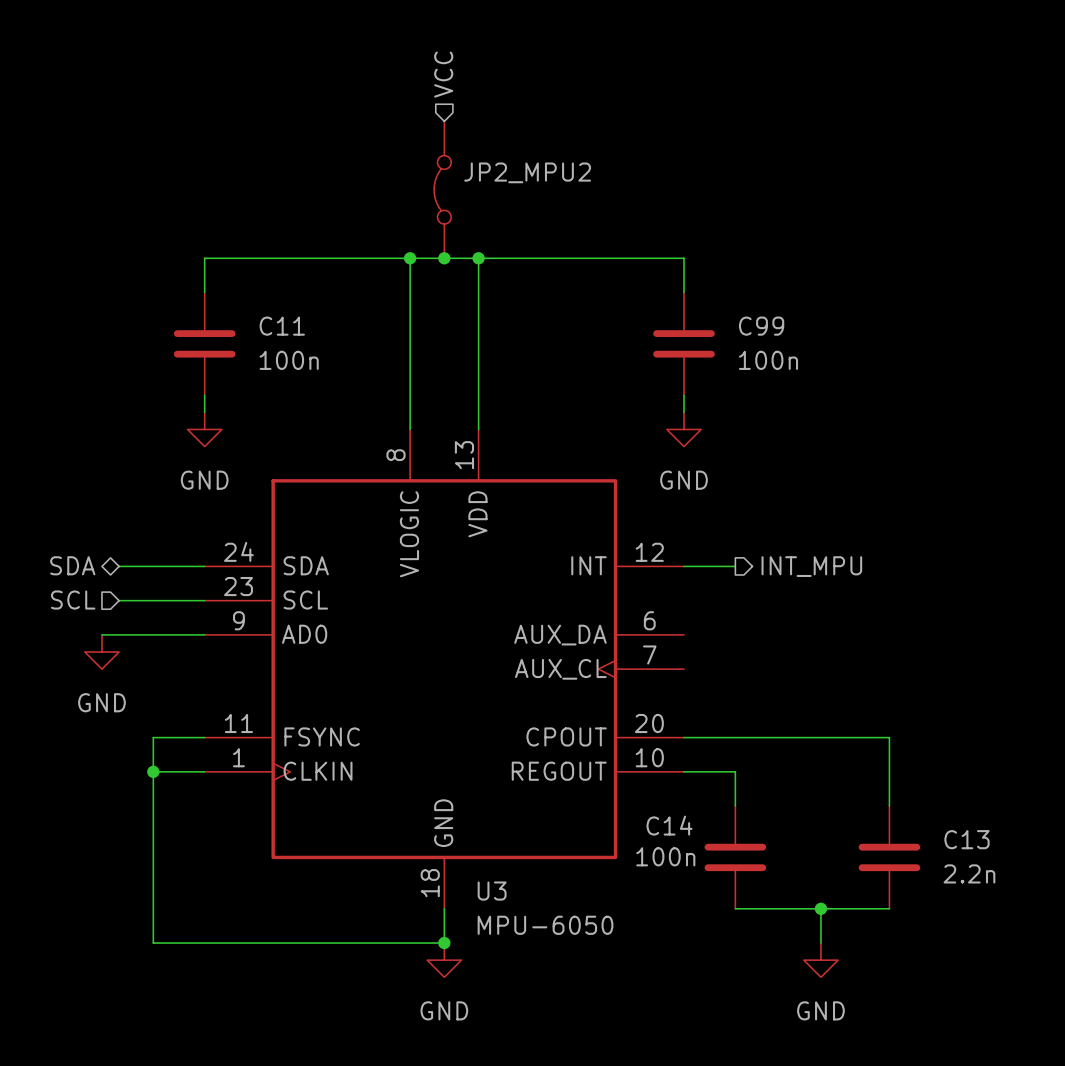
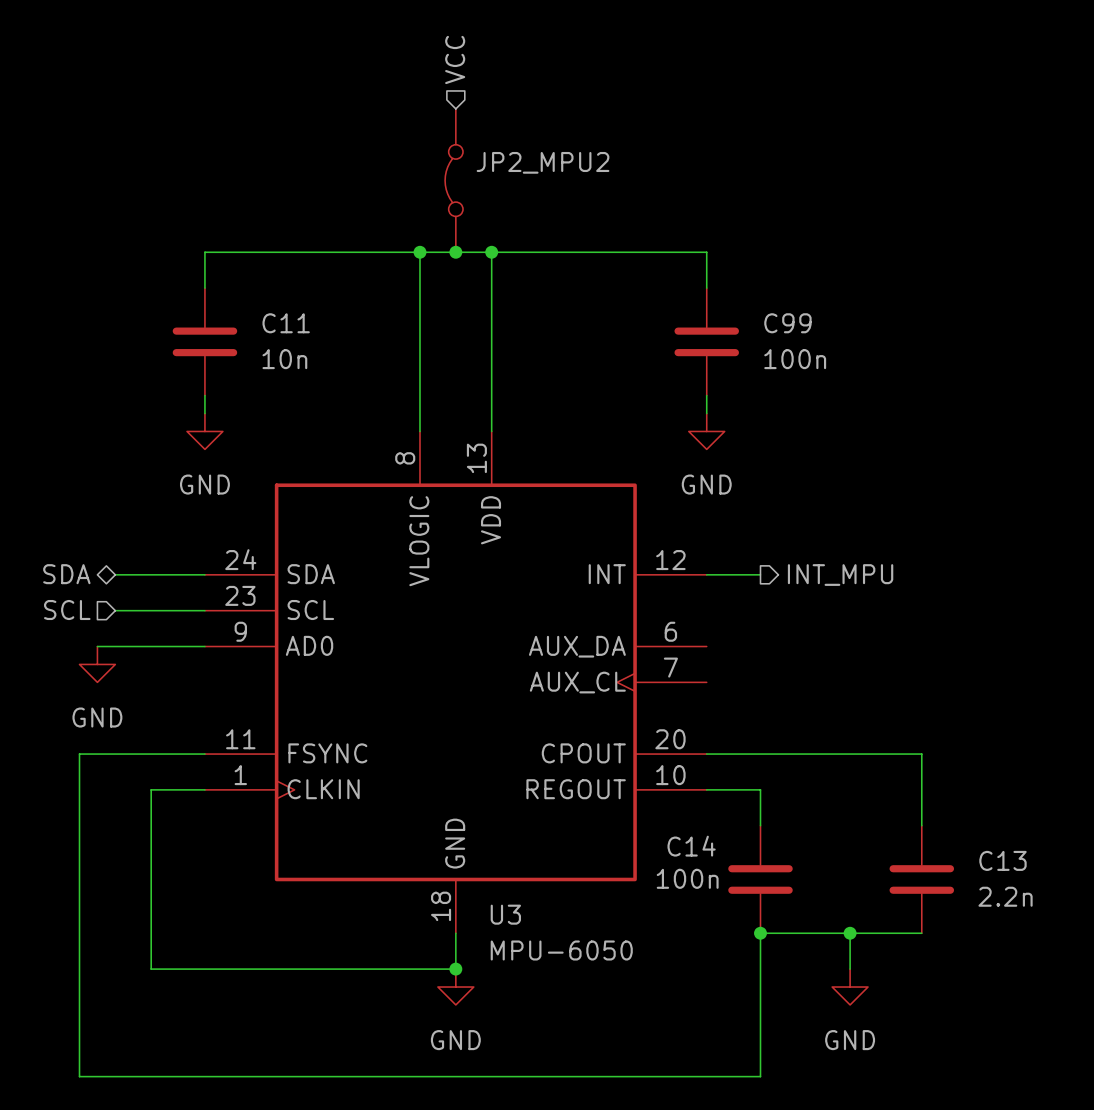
C11 value: 100n (289, 360) -> 10n (284, 359)
wire: (153, 737) (153, 771) -> (151, 754) (79, 754) (79, 1076) (760, 1076) (760, 933)
junction: (153, 771) -> none
junction: none -> (760, 933)

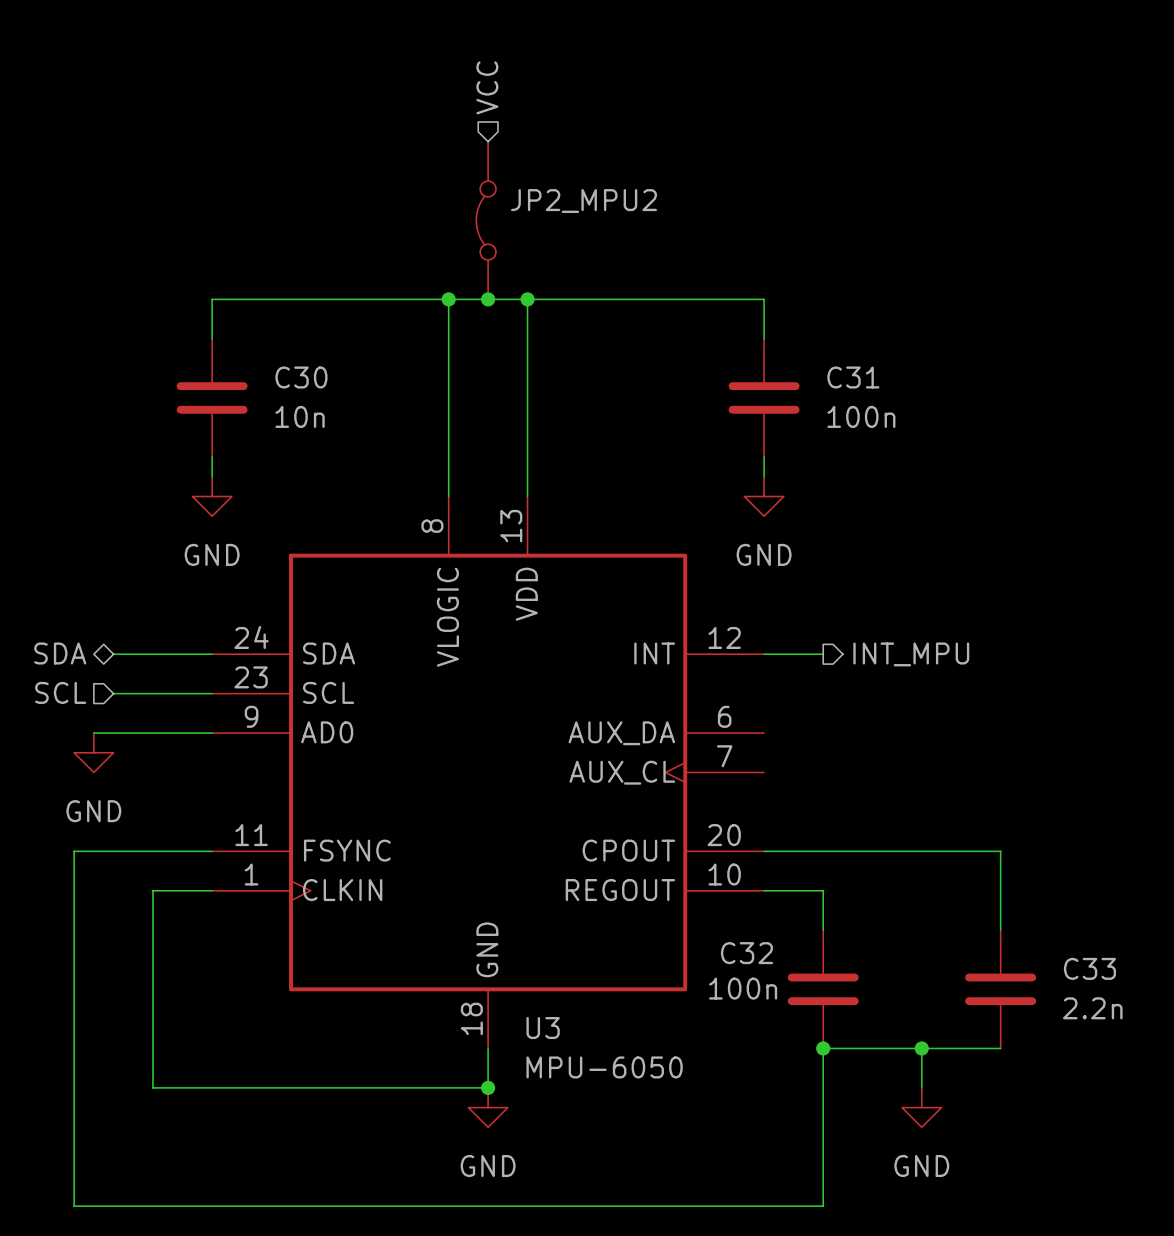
C11 name: C11 (286, 323) -> C30 (301, 377)
C99 name: C99 (787, 323) -> C31 (853, 377)
C14 name: C14 (691, 846) -> C32 (746, 953)
C13 name: C13 (1002, 860) -> C33 (1089, 968)

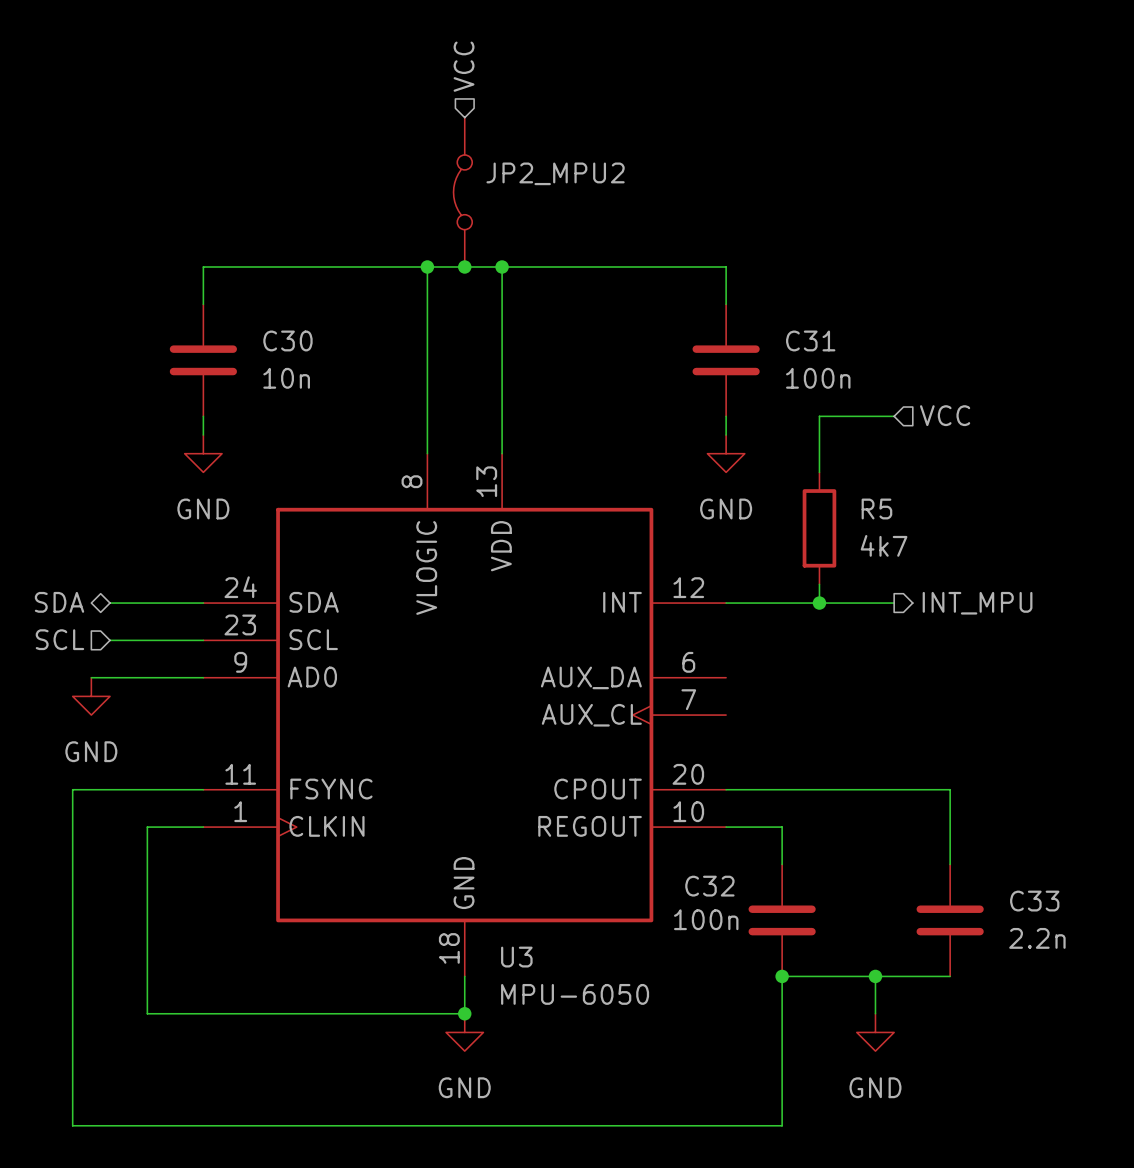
hierarchical label: none -> VCC (945, 415)
wire: none -> (894, 416) (819, 416) (819, 472)
R5: none -> 4k7 (819, 528)
wire: none -> (819, 584) (819, 603)
wire: none -> (782, 603) (894, 603)
junction: none -> (819, 603)
hierarchical label position: INT_MPU (911, 654) -> INT_MPU (977, 603)

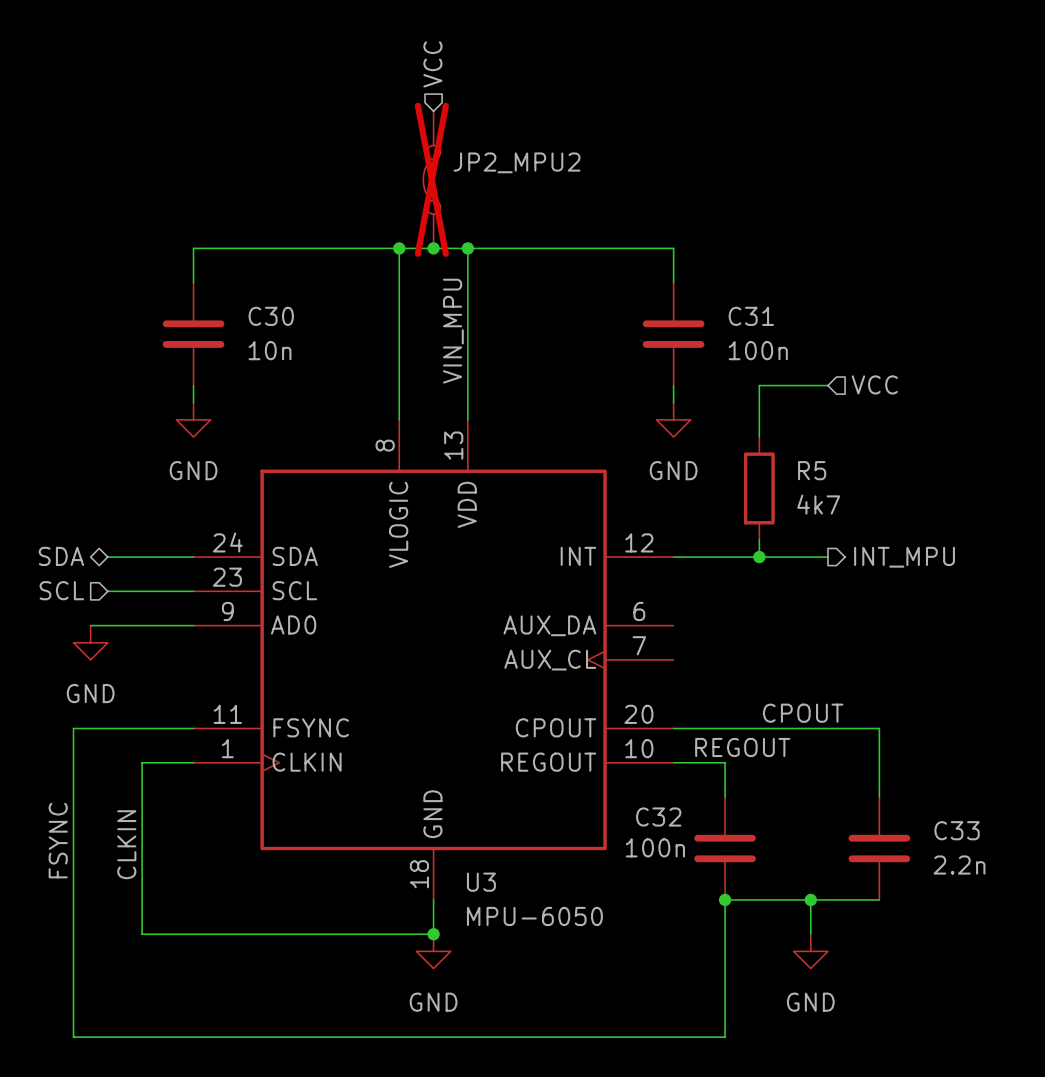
JP2_MPU2 do-not-place cross: none -> (431, 179)
label: none -> VIN_MPU (453, 331)
label: none -> CPOUT (803, 713)
label: none -> REGOUT (742, 747)
label: none -> FSYNC (58, 840)
label: none -> CLKIN (126, 844)

